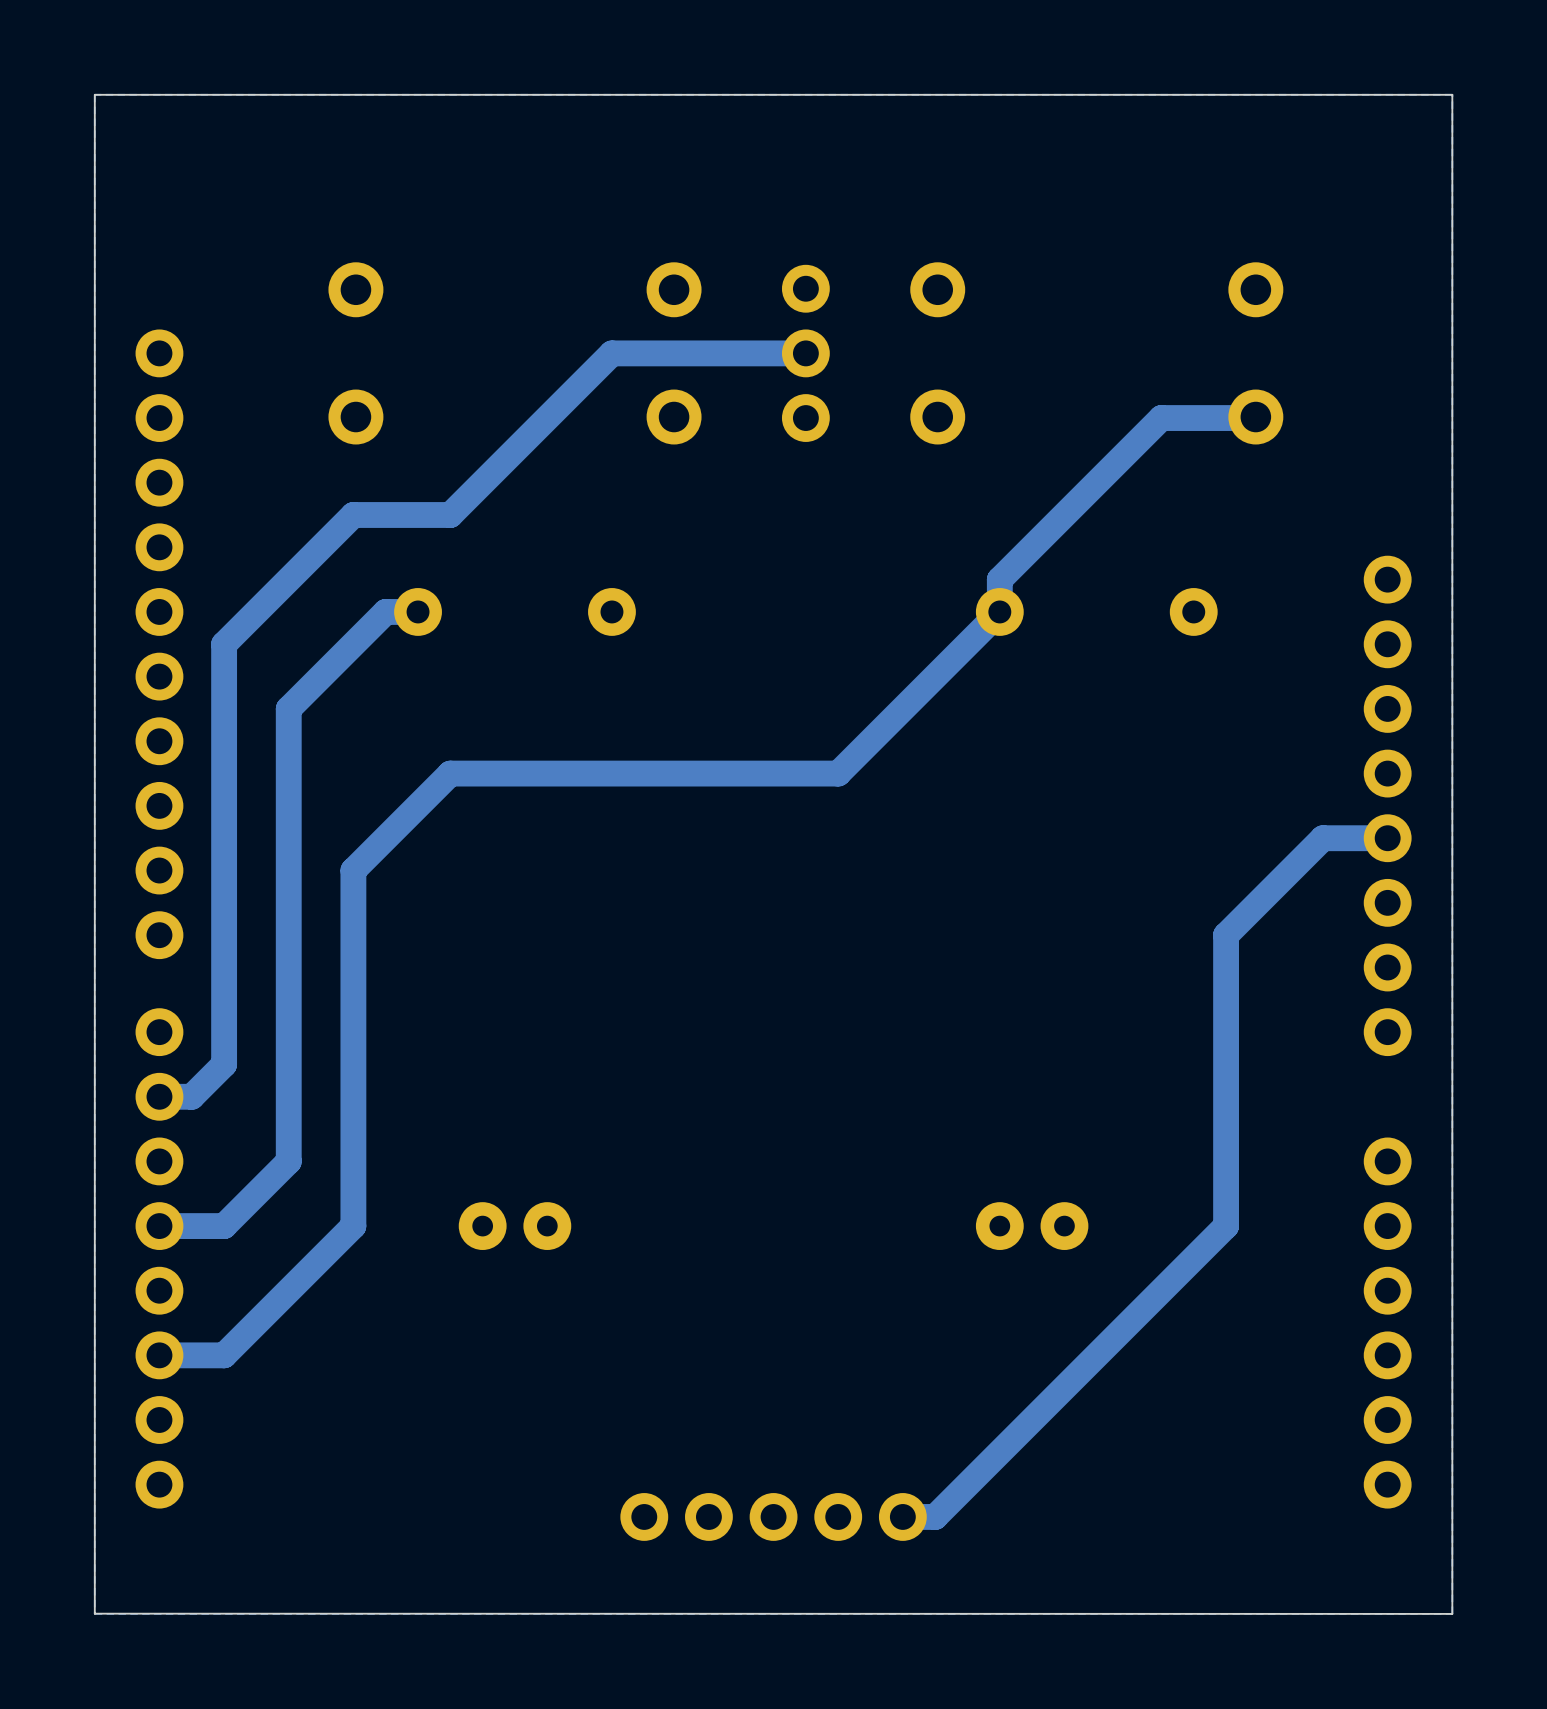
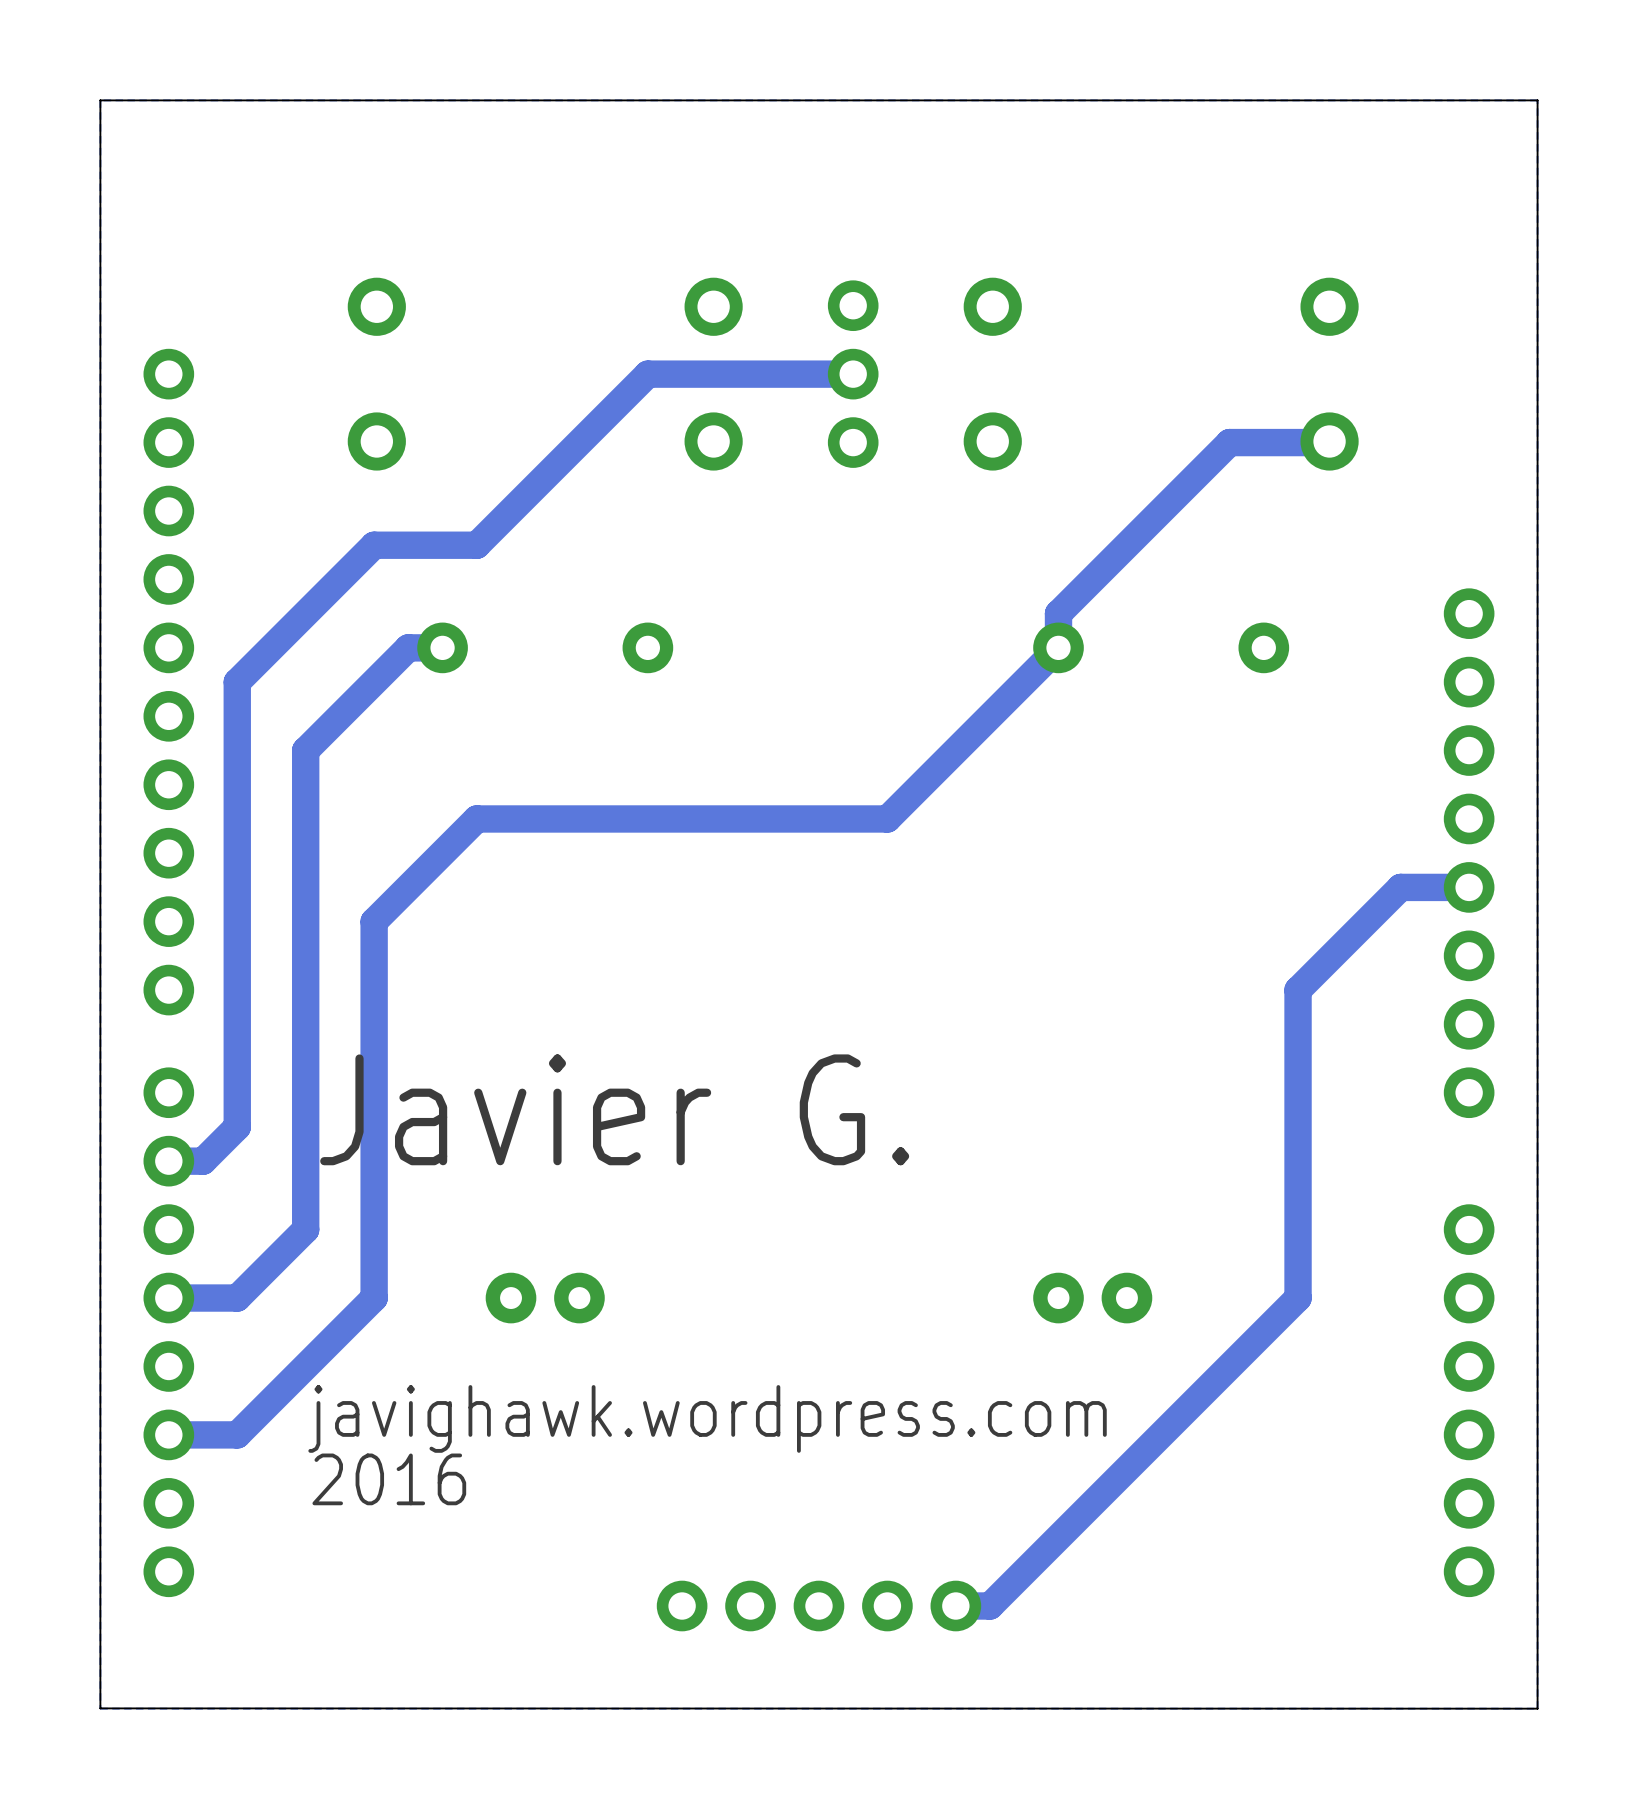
text: none -> Javier G. (614, 1109)
text: none -> javighawk.wordpress.com (707, 1418)
text: none -> 2016 (389, 1479)

